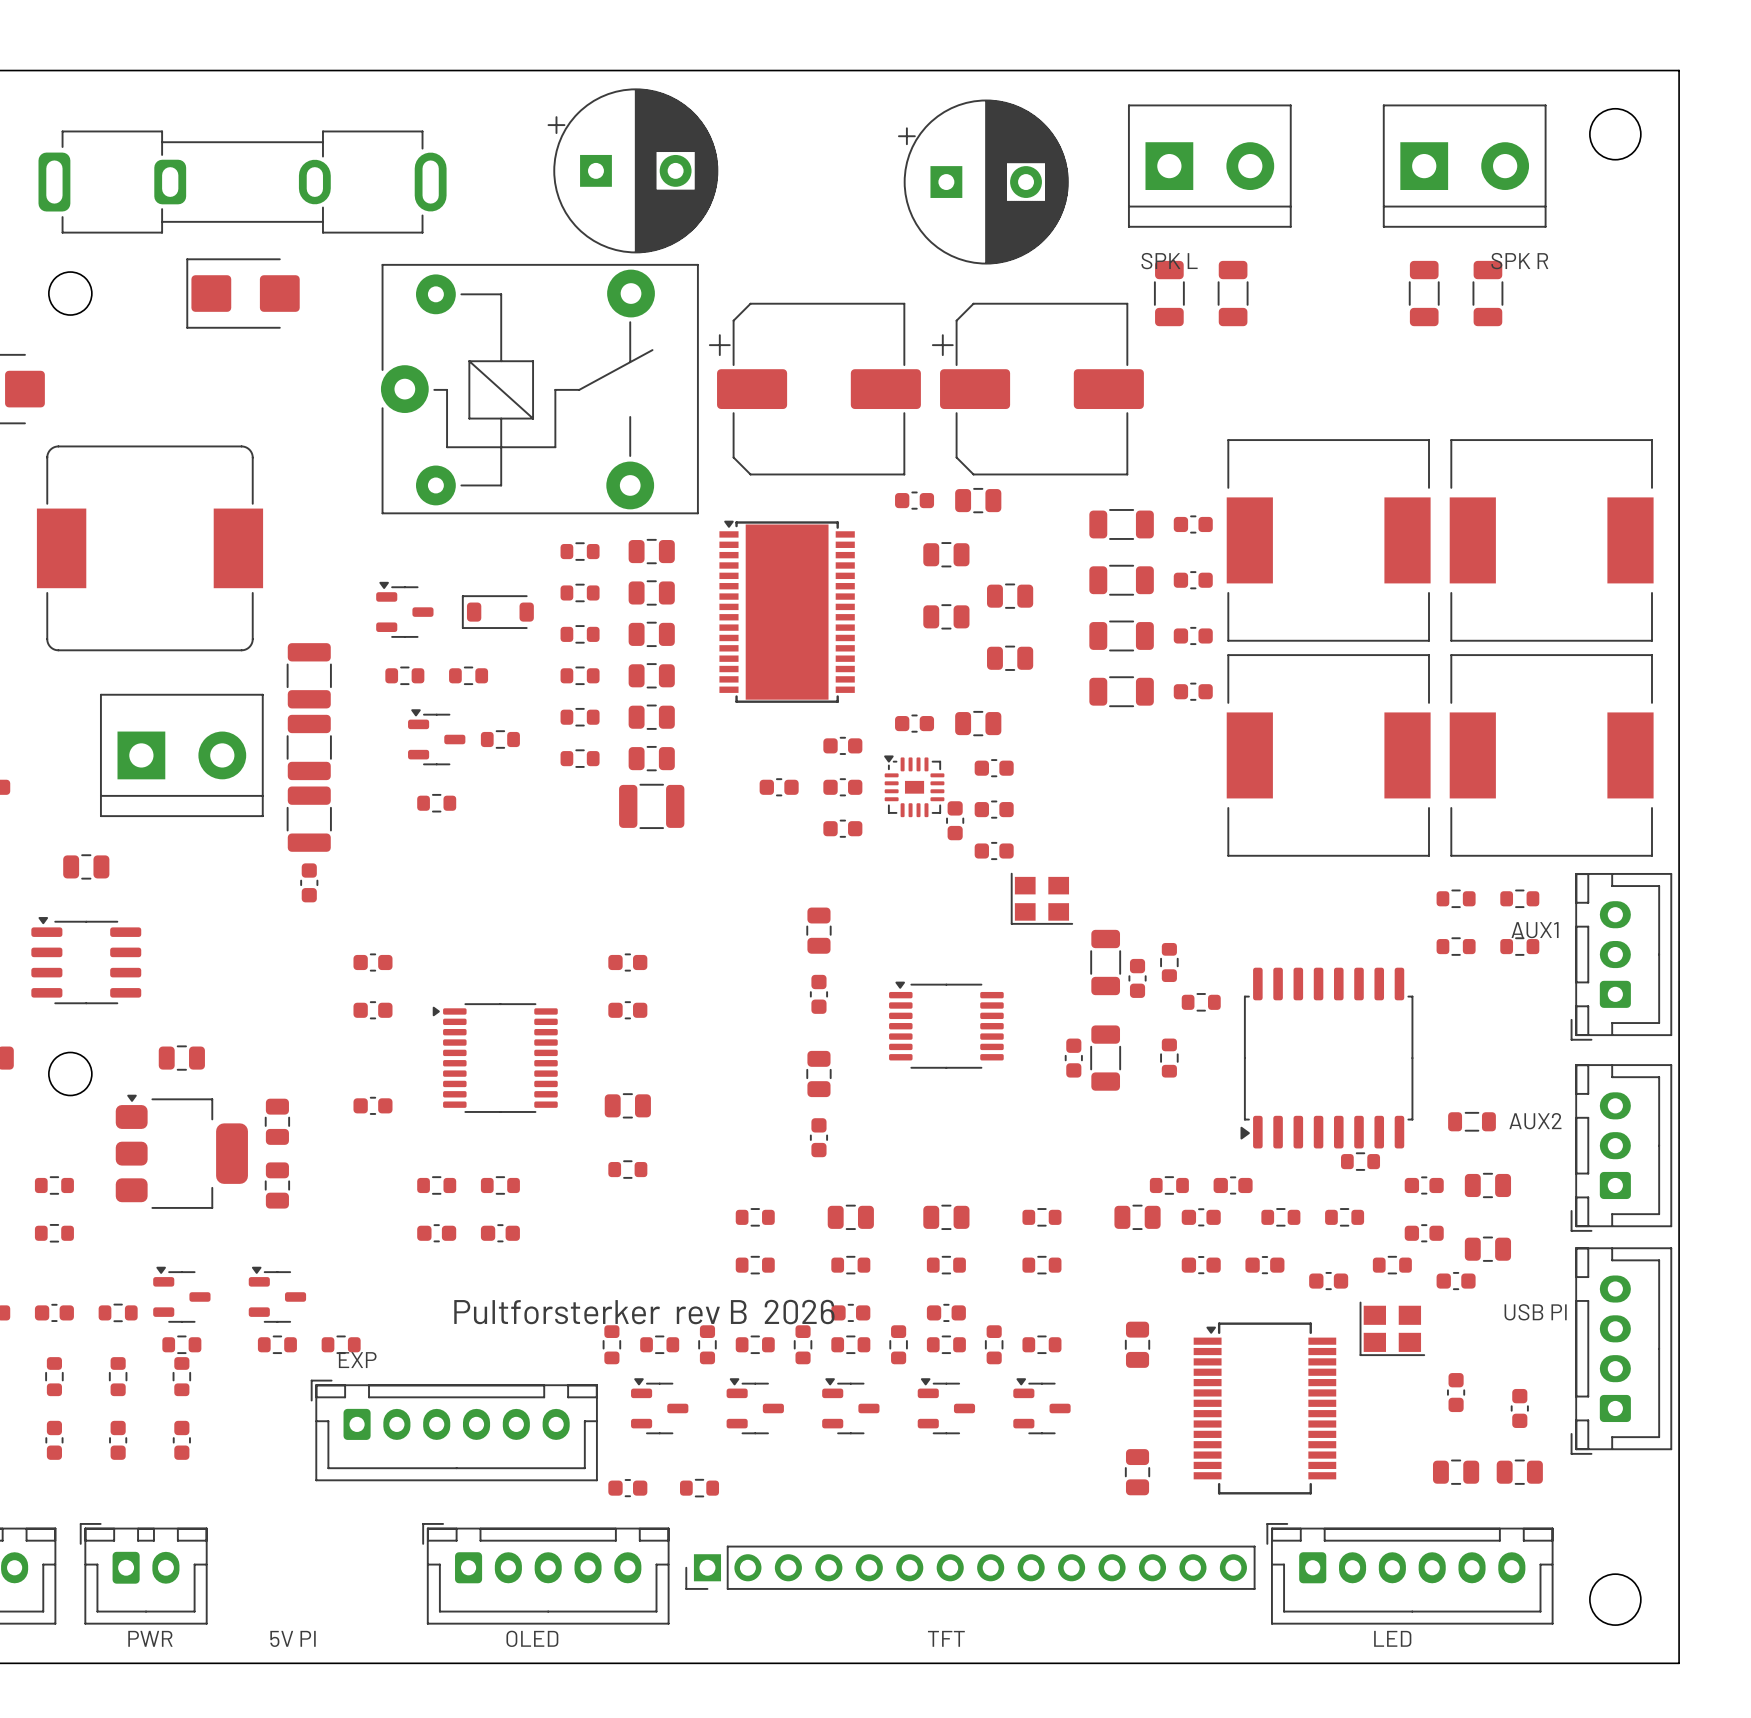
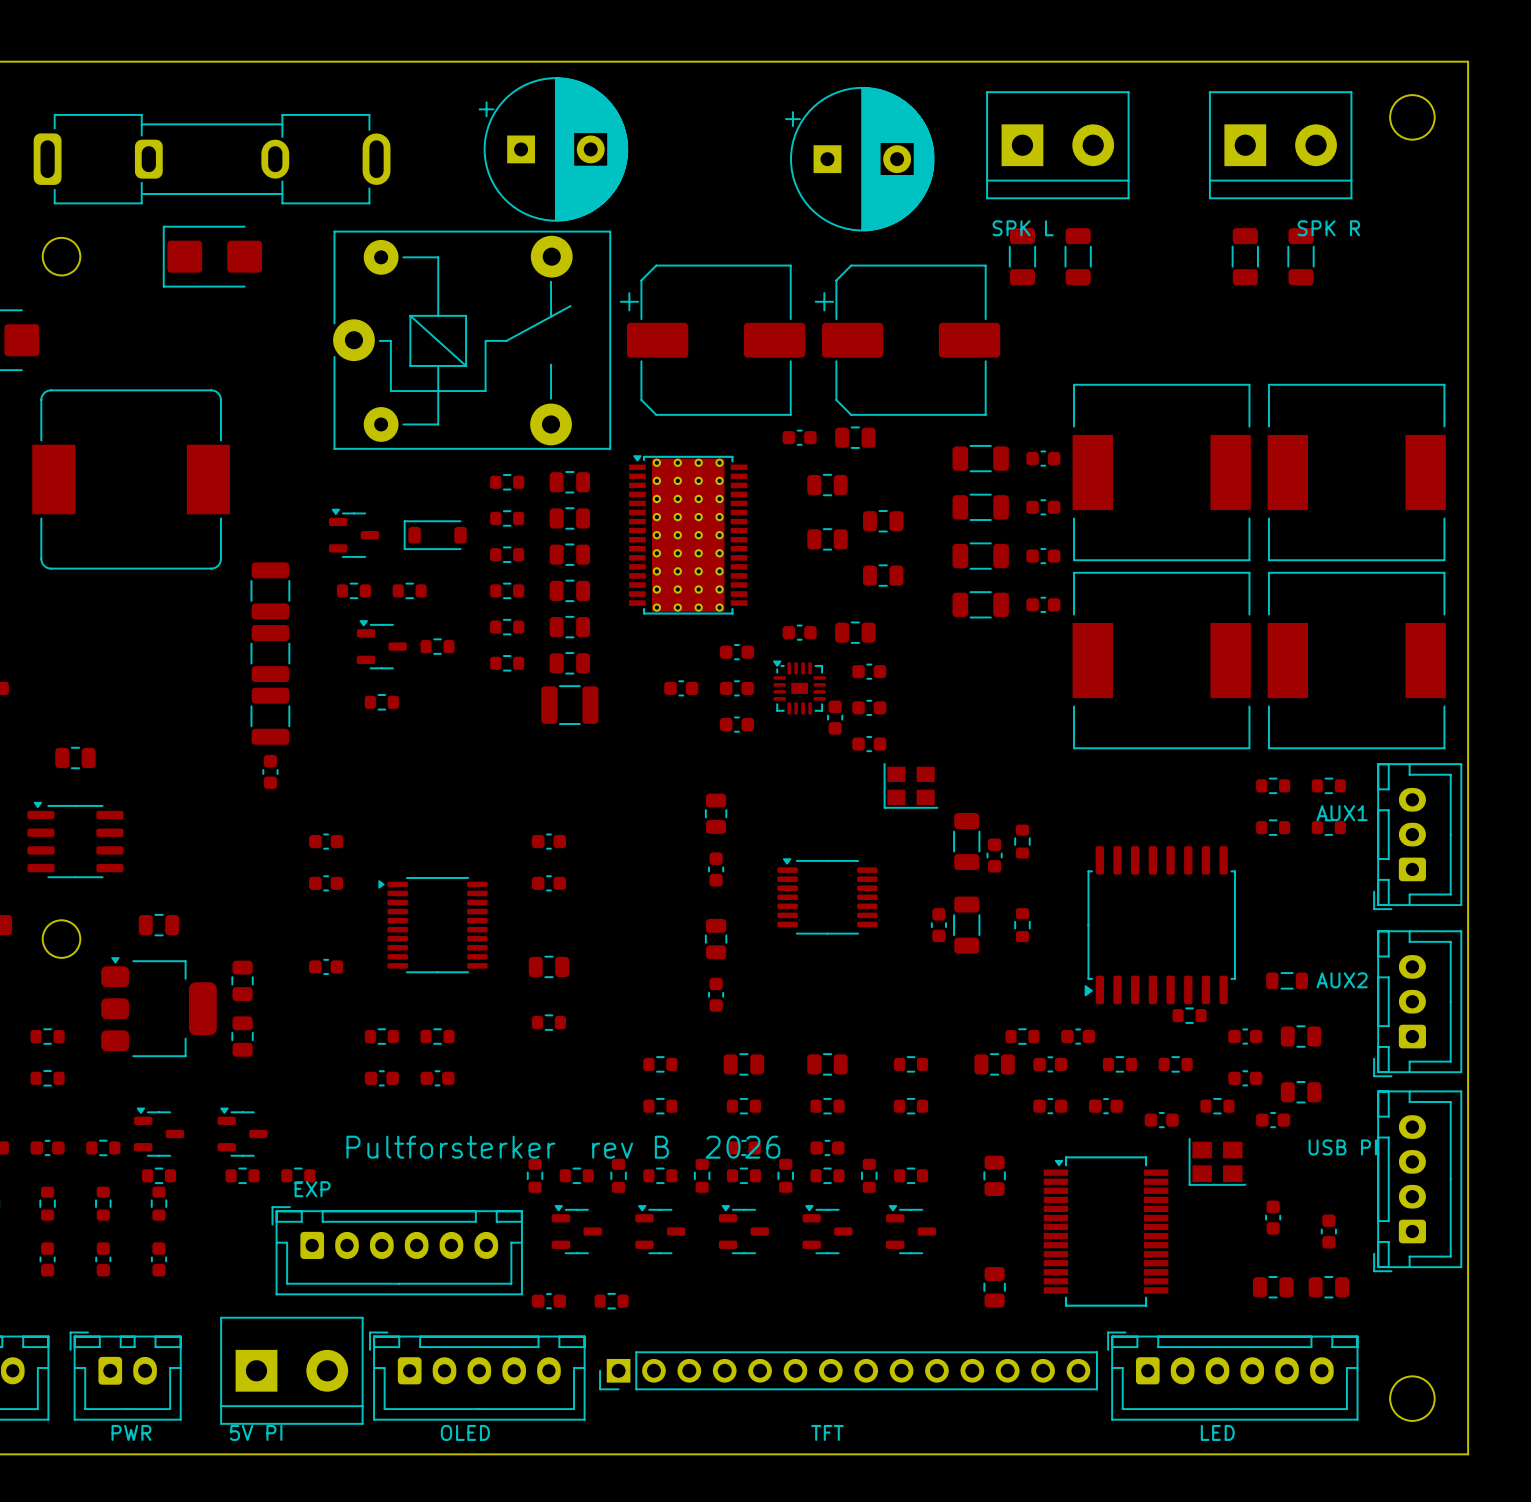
part footprint: [719, 520, 855, 703] -> [629, 455, 748, 615]
part: (181, 755) -> none
part: (1201, 1002) -> none
part: none -> (291, 1370)

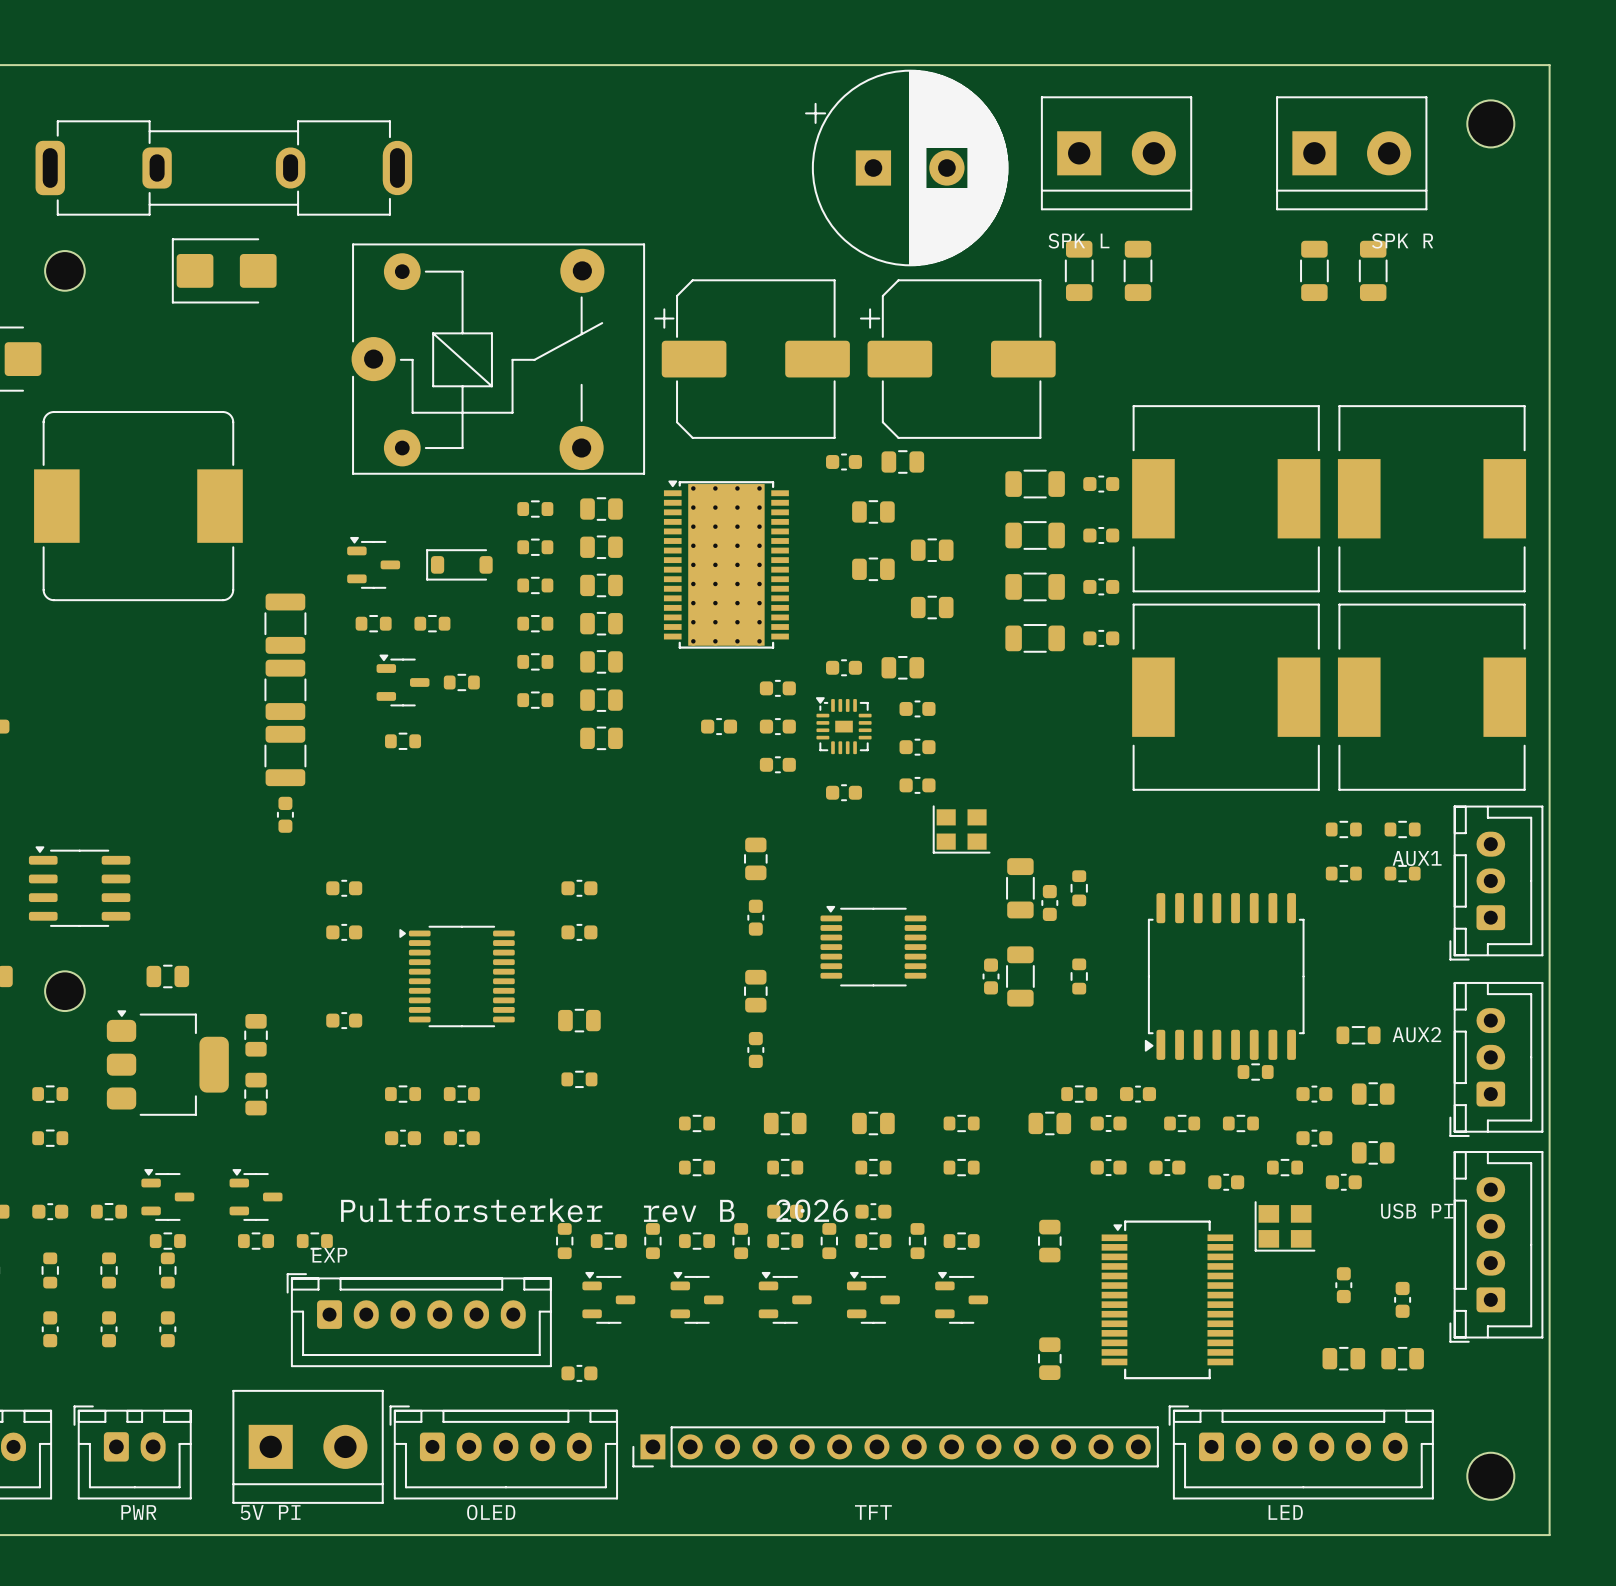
part footprint: [785, 87, 935, 232] -> [805, 69, 1009, 267]
part: (553, 149) -> none
part footprint: [541, 685, 599, 725] -> [580, 726, 623, 751]
part rotation: 0° (835, 717) -> 90° clockwise (844, 792)
part position: (835, 717) -> (844, 792)
part: (75, 758) -> none
part: (611, 1301) -> none

